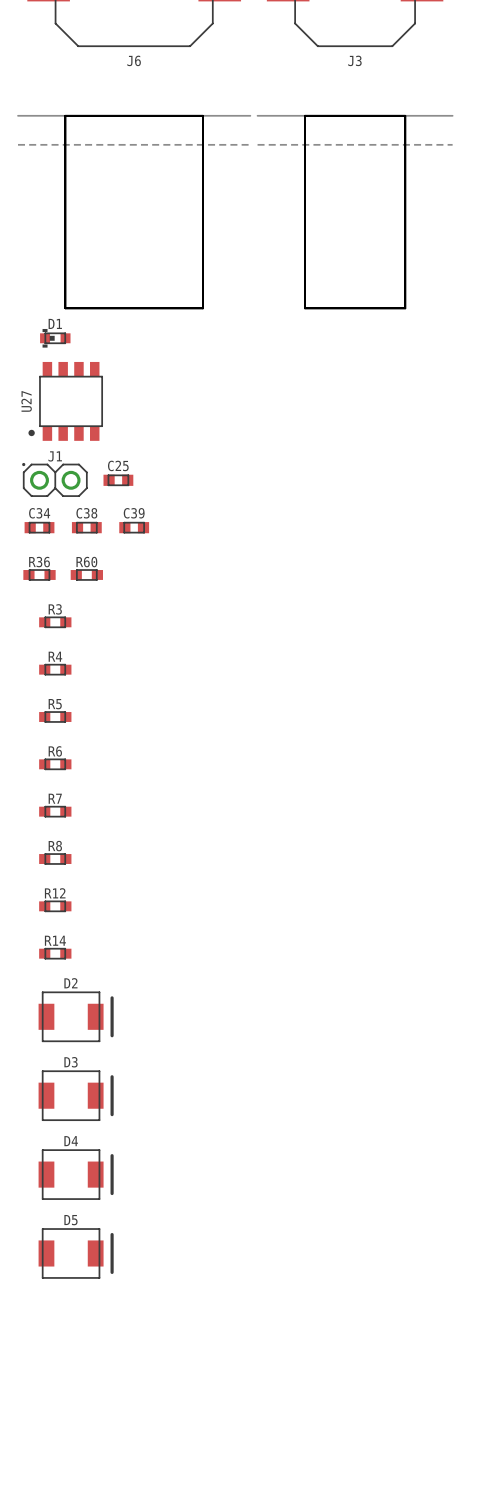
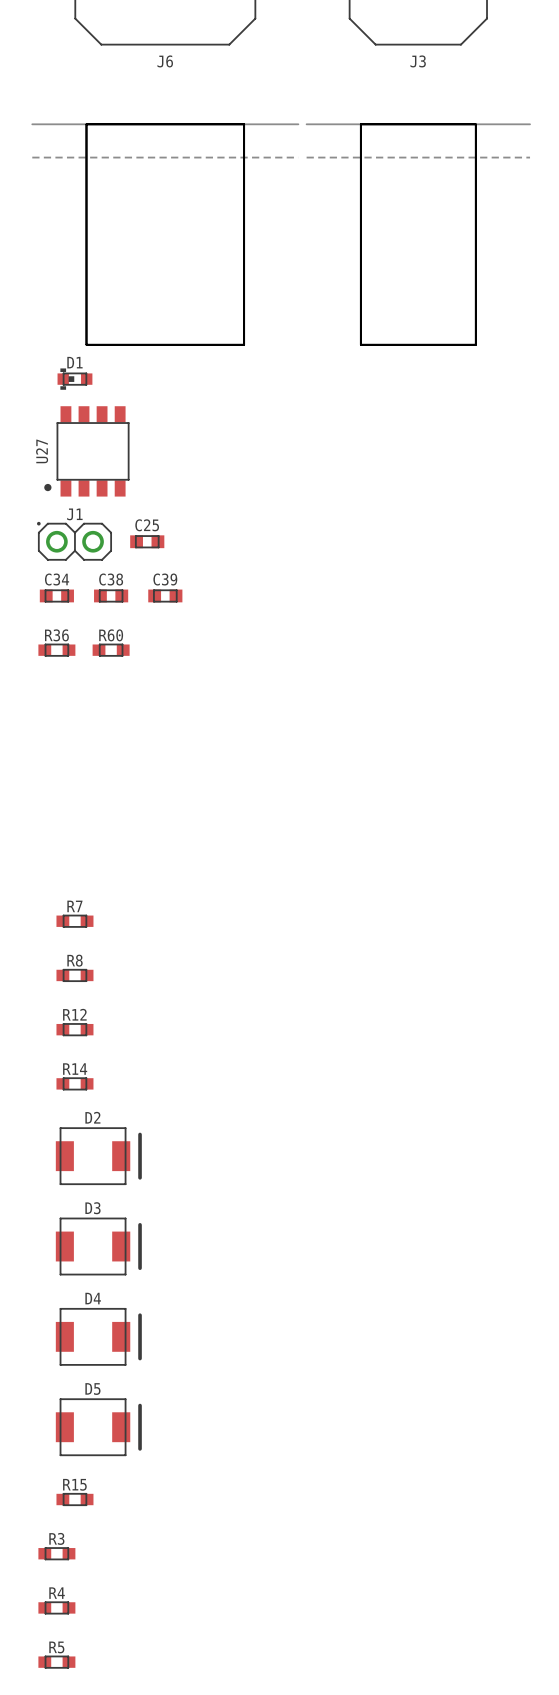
R3 position: (55, 622) -> (56, 1553)
R4 position: (55, 669) -> (56, 1607)
R5 position: (55, 716) -> (56, 1662)
R6: (55, 764) -> none
R15: none -> (74, 1499)

